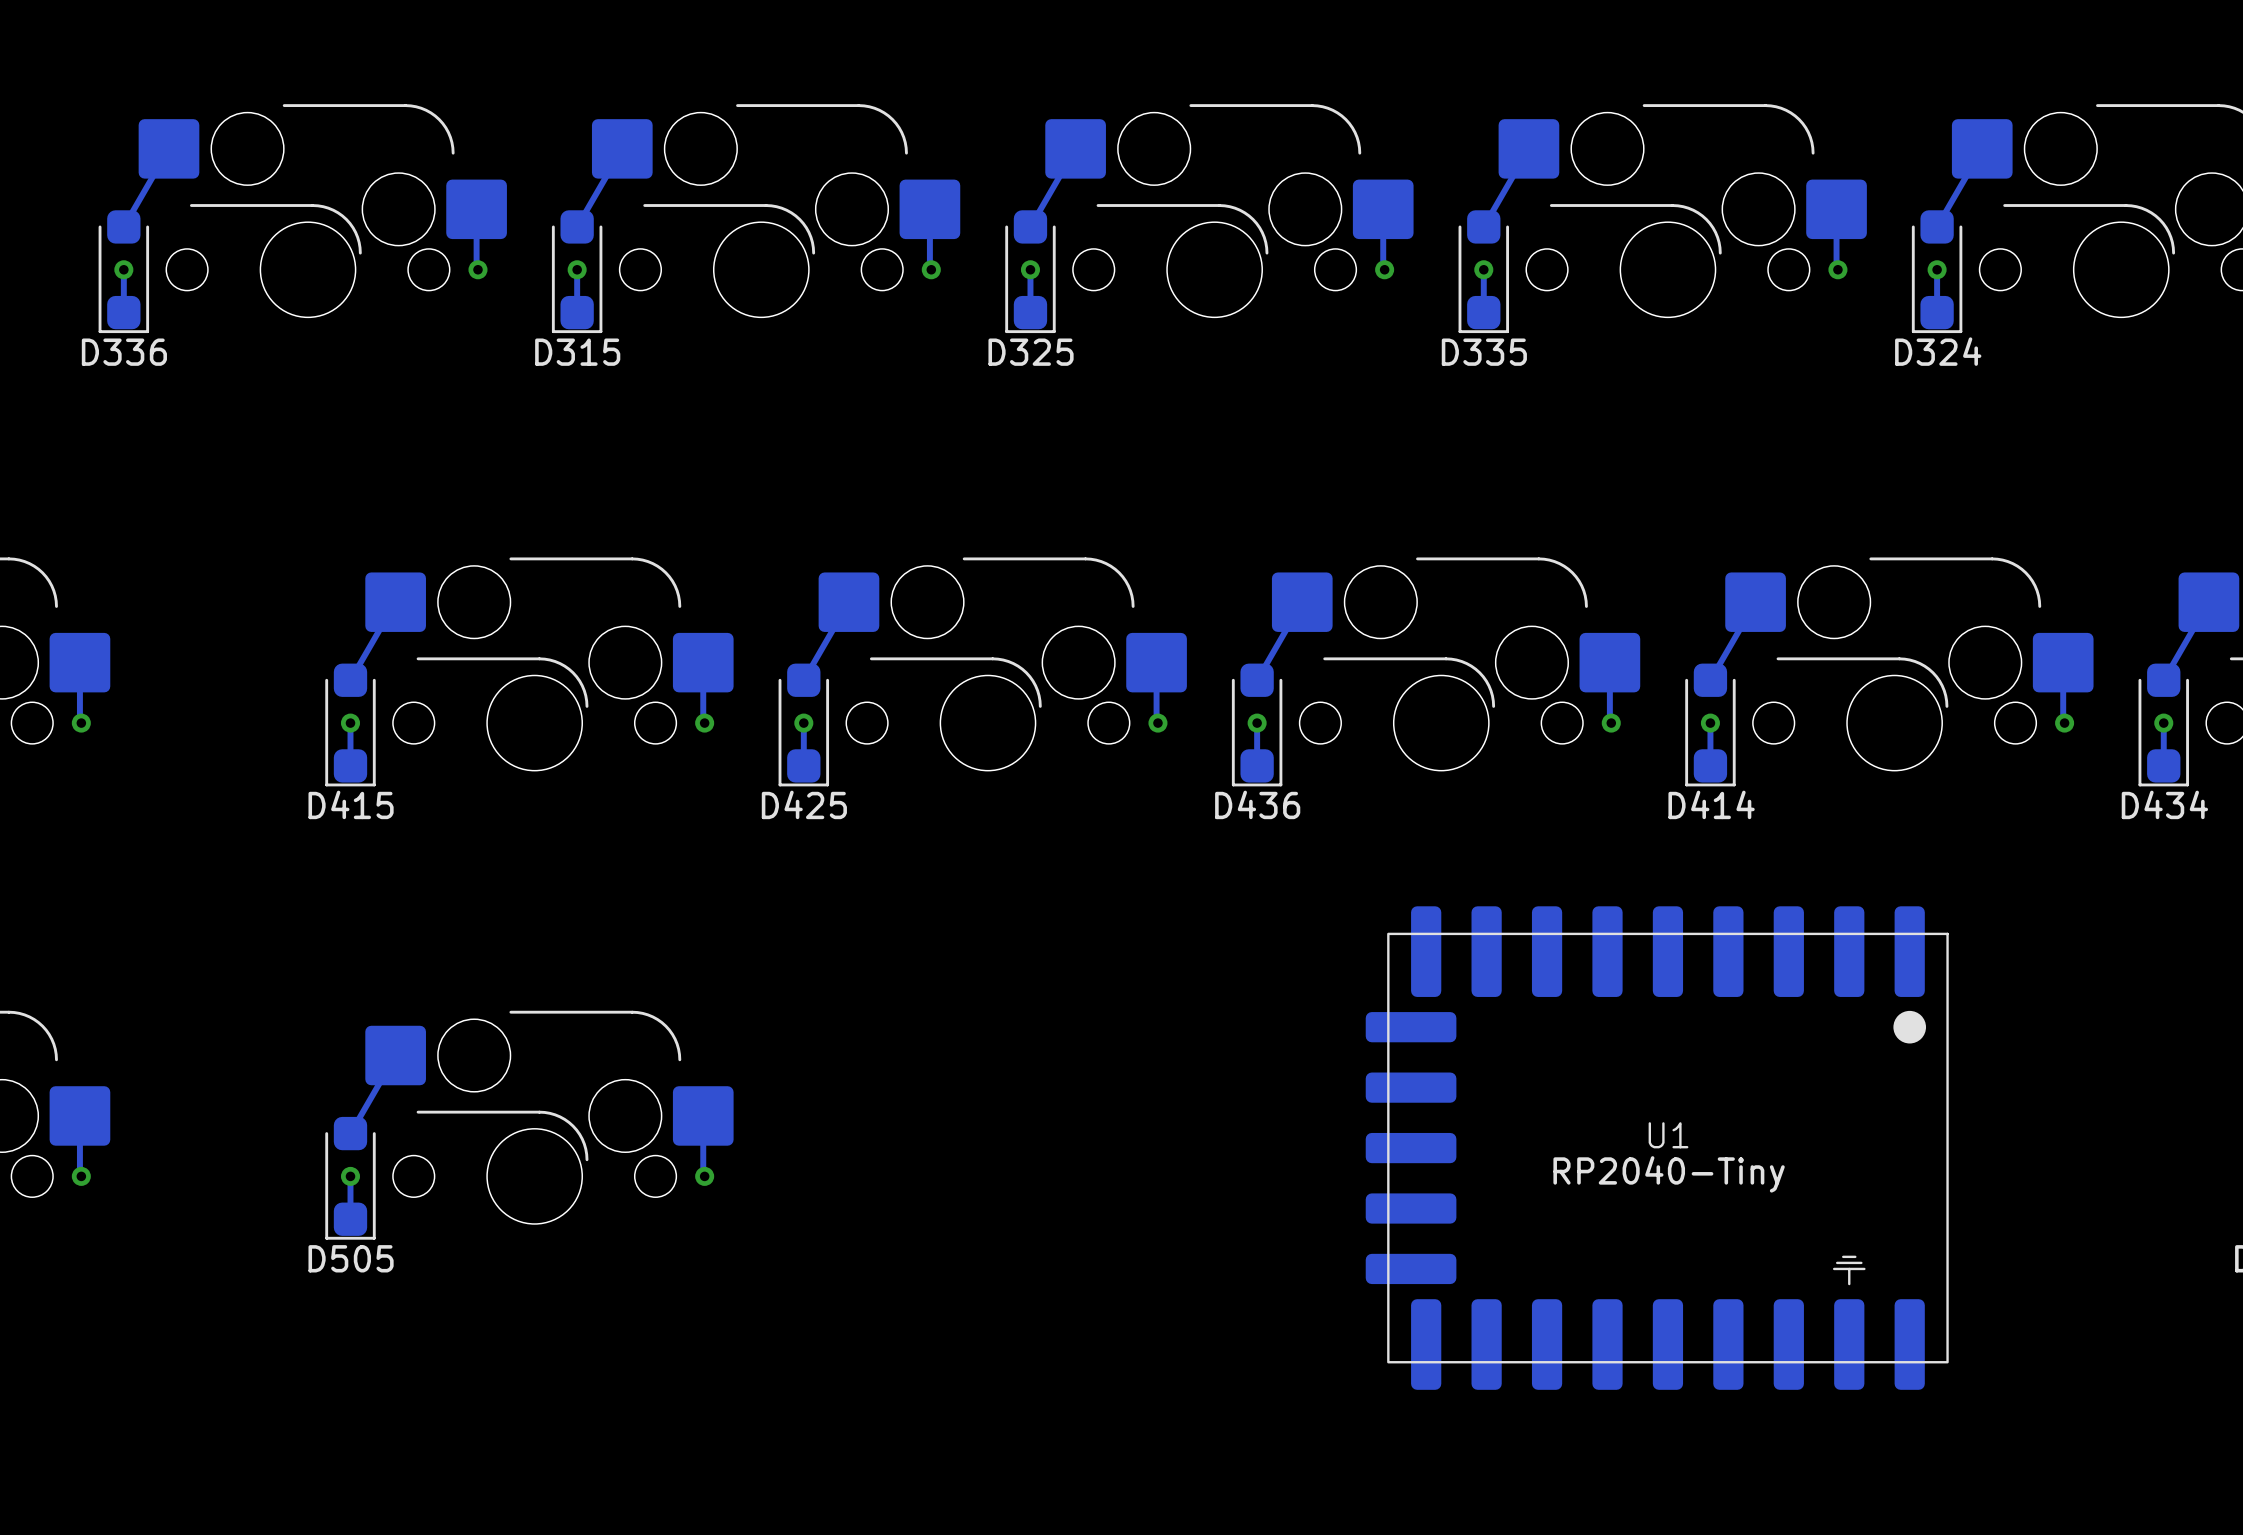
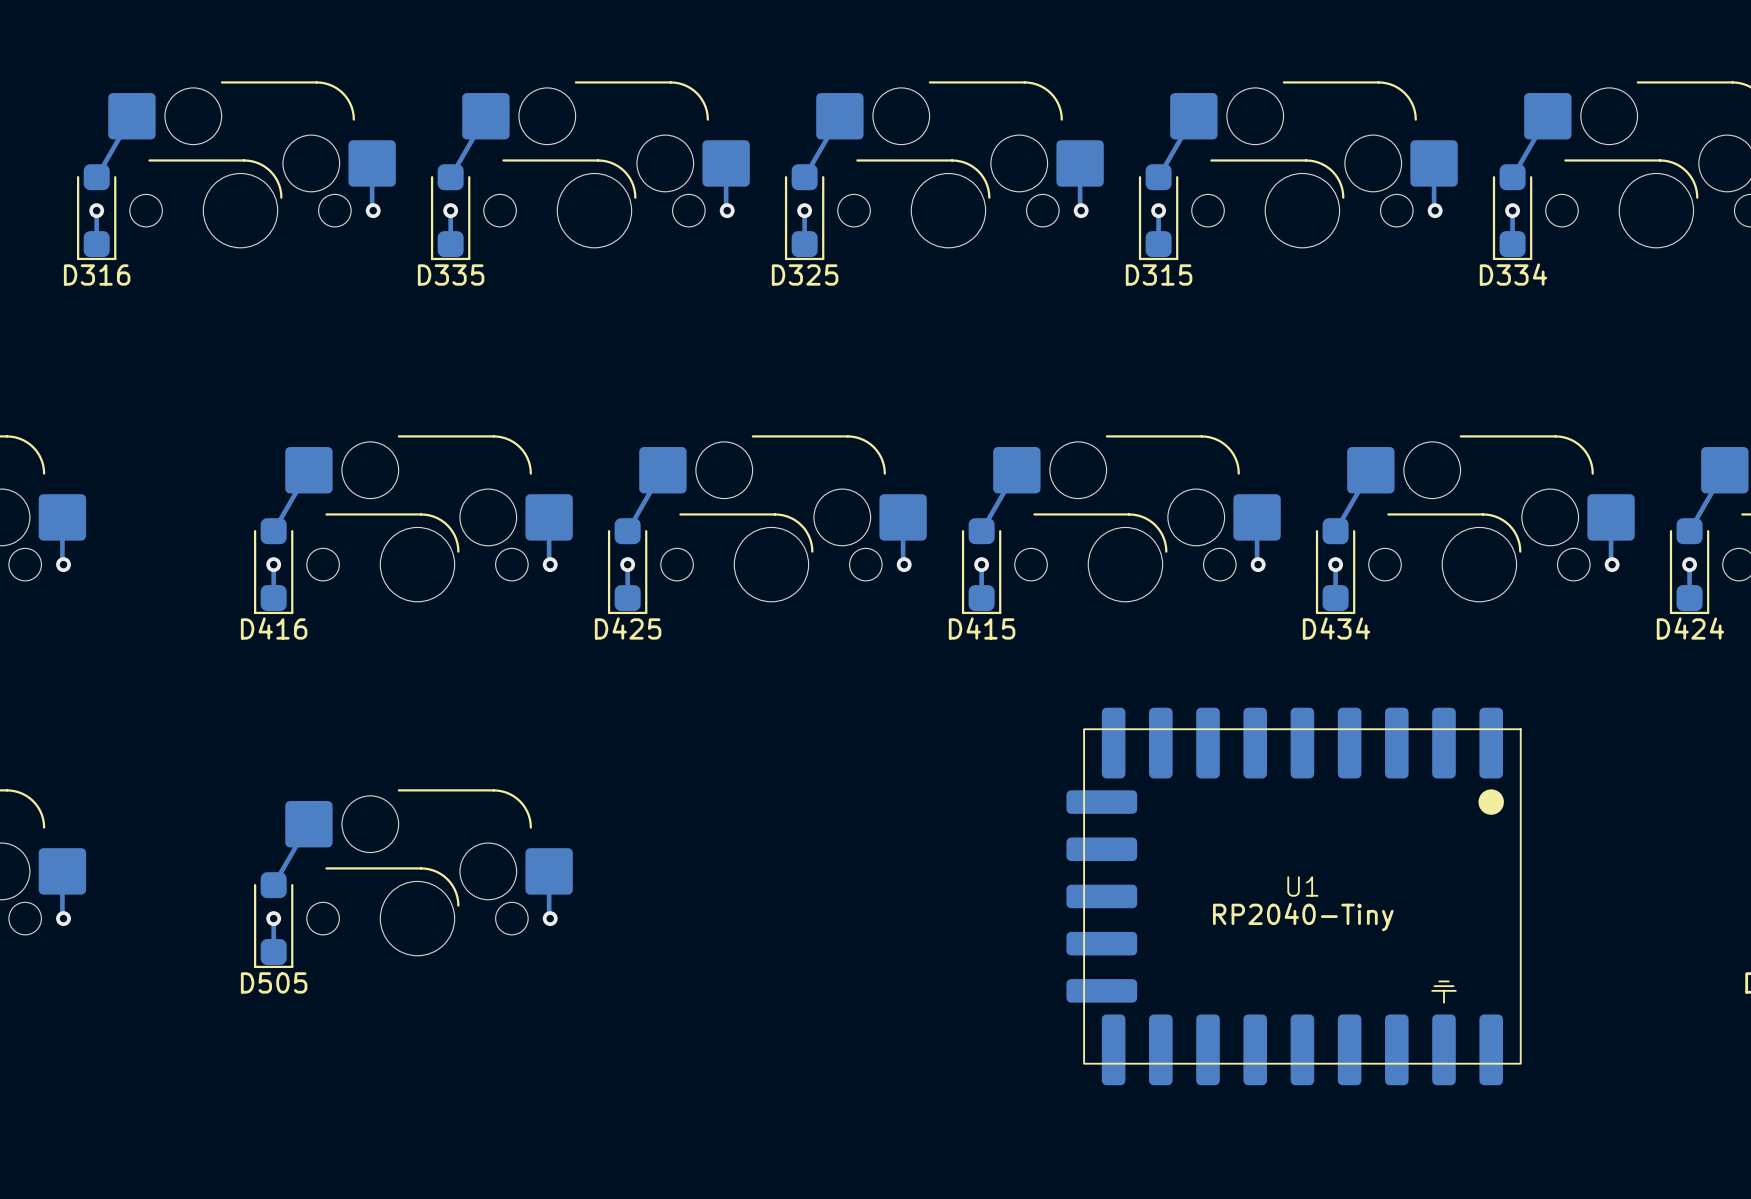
D324 name: D324 (1938, 351) -> D334 (1513, 274)
D336 name: D336 (124, 352) -> D316 (97, 274)
D315 name: D315 (577, 352) -> D335 (451, 274)
D335 name: D335 (1484, 352) -> D315 (1159, 274)
D415 name: D415 (351, 804) -> D416 (274, 628)
D436 name: D436 (1257, 804) -> D415 (982, 628)
D414 name: D414 (1711, 804) -> D434 (1336, 628)
D434 name: D434 (2164, 804) -> D424 (1690, 628)

